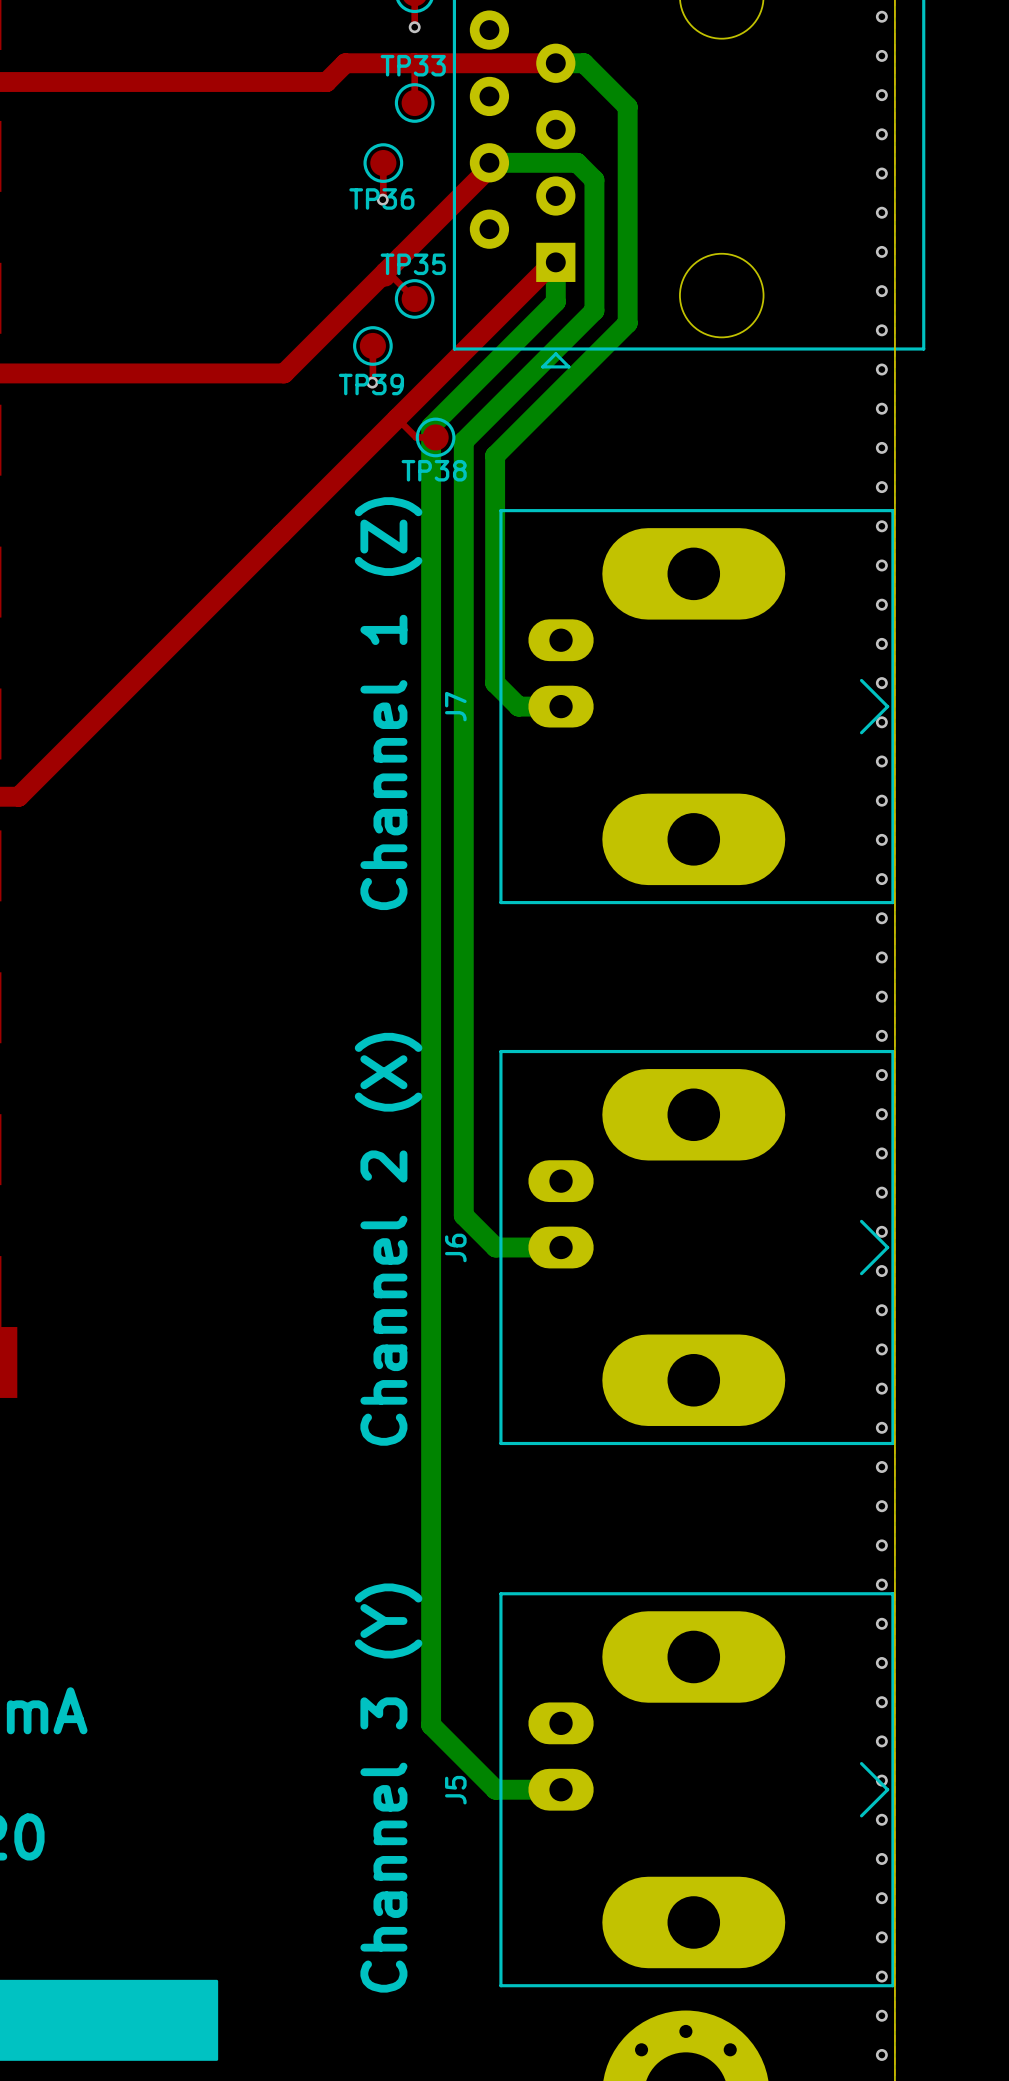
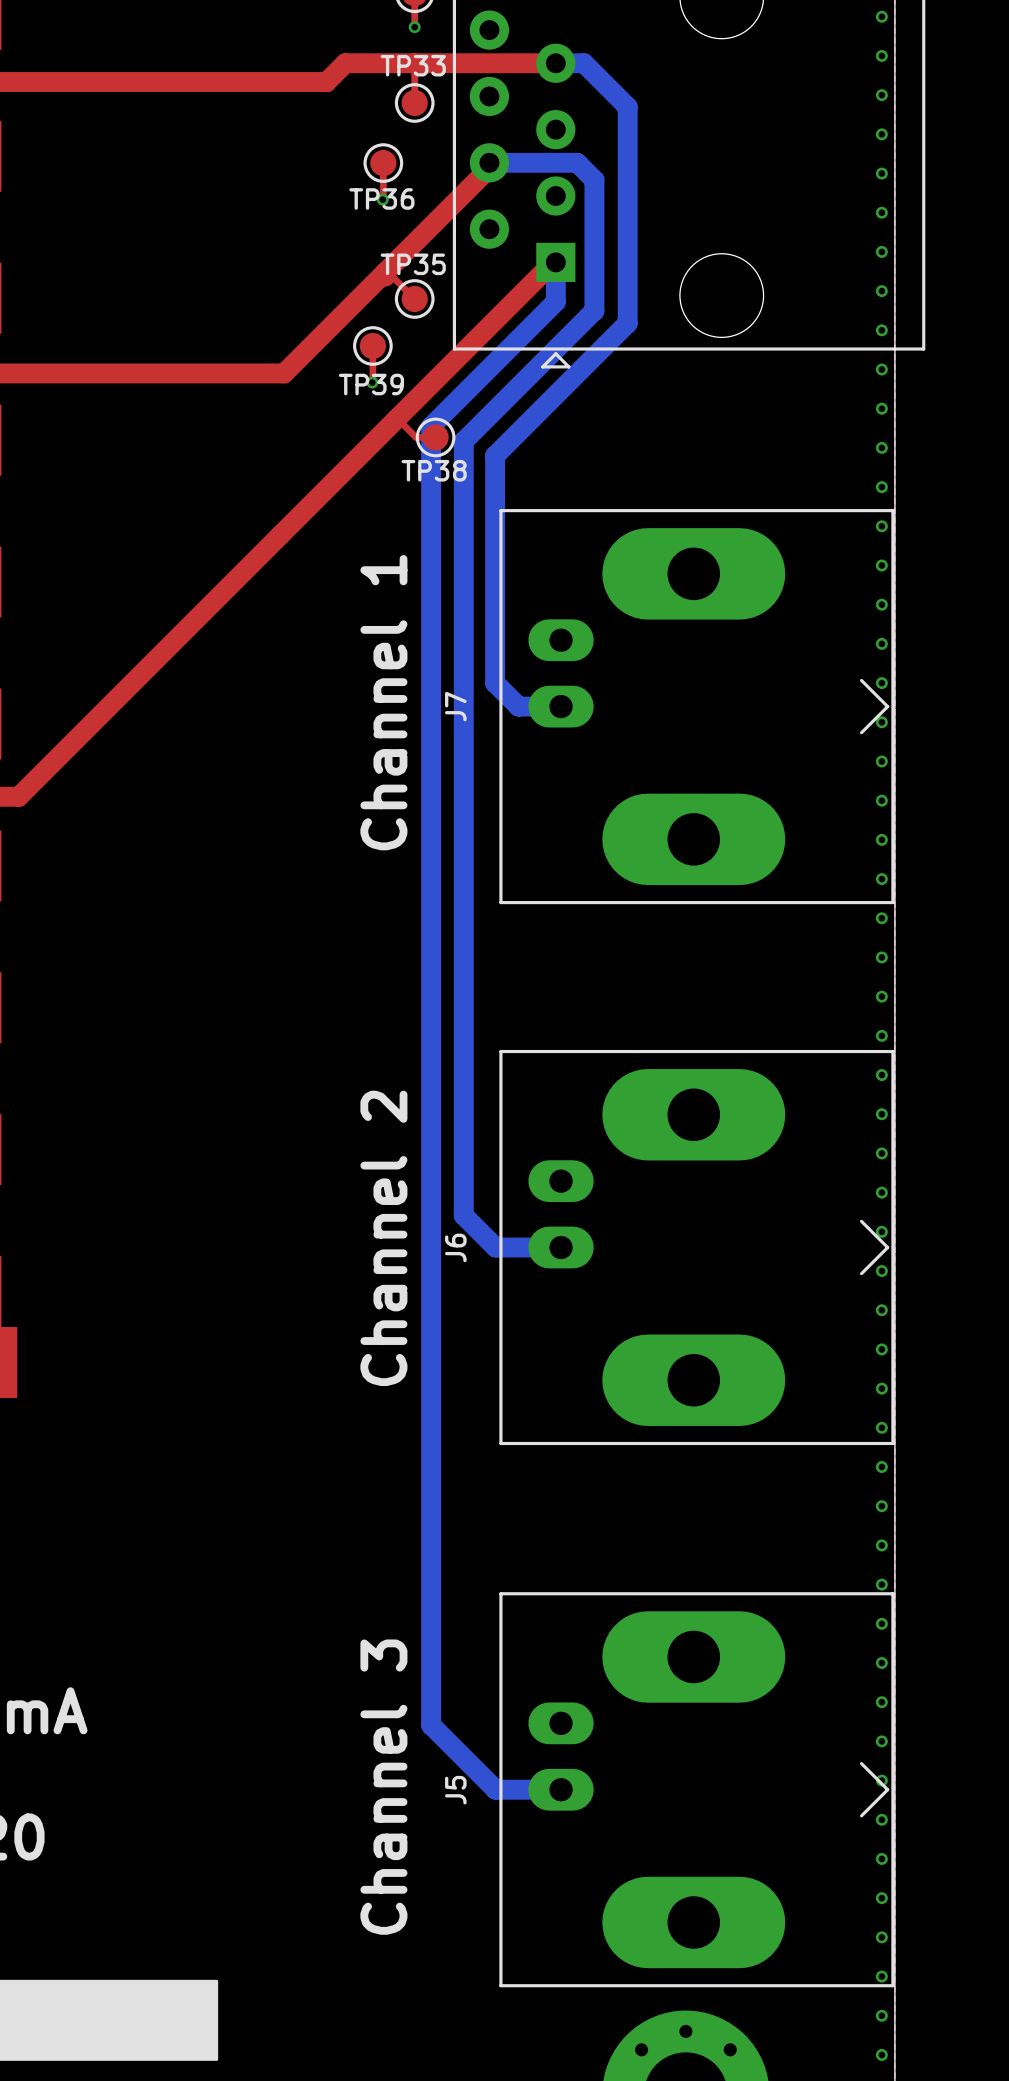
text: Channel 1 (Z) (388, 703) -> Channel 1 (383, 702)
text: Channel 2 (X) (388, 1239) -> Channel 2 (383, 1238)
text: Channel 3 (Y) (388, 1788) -> Channel 3 (383, 1787)

